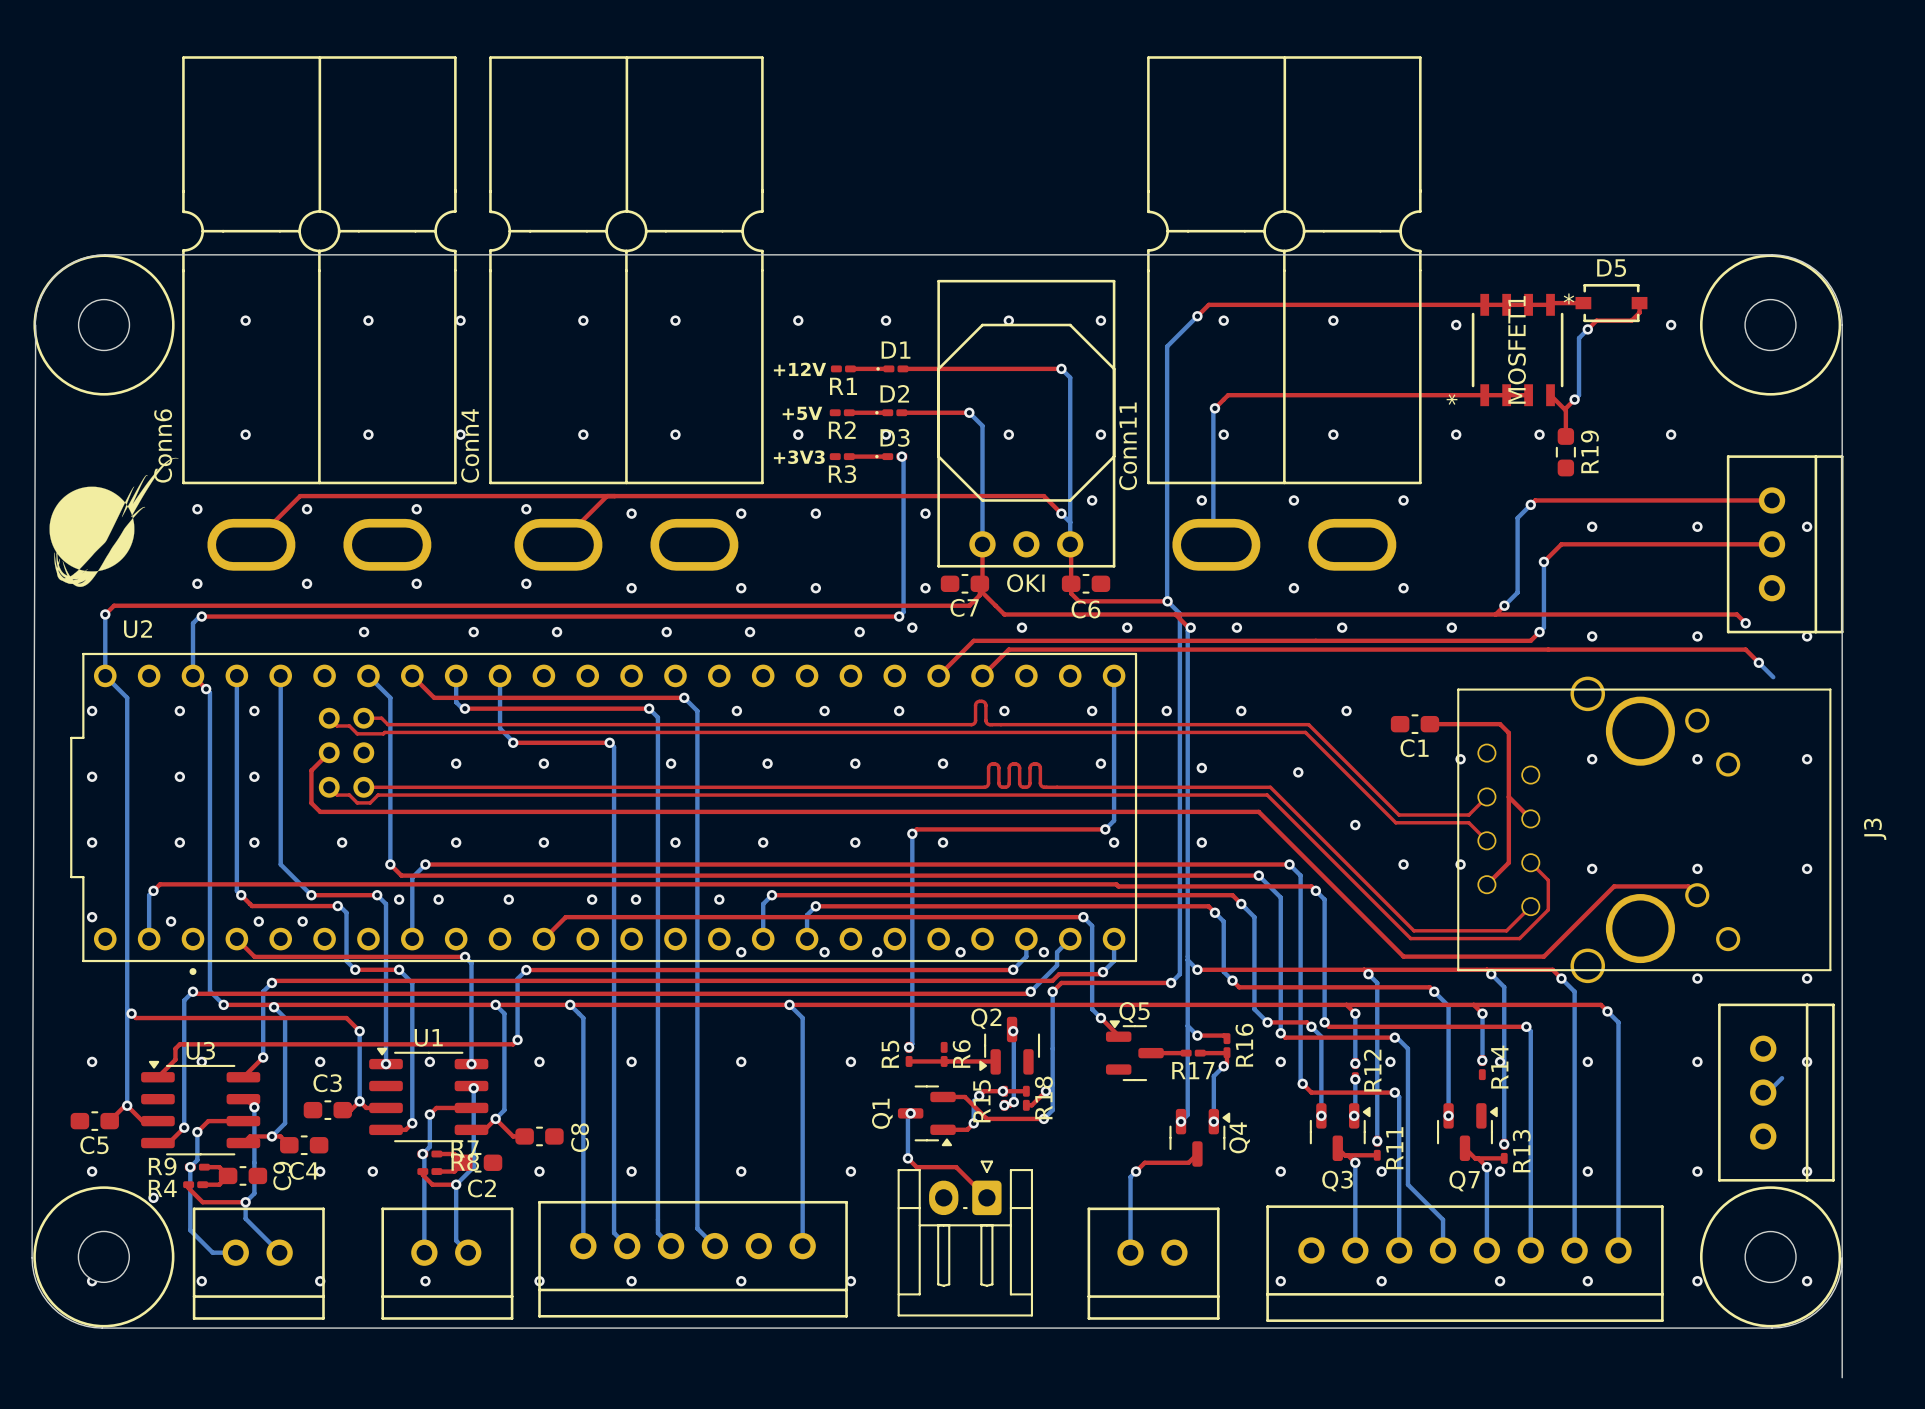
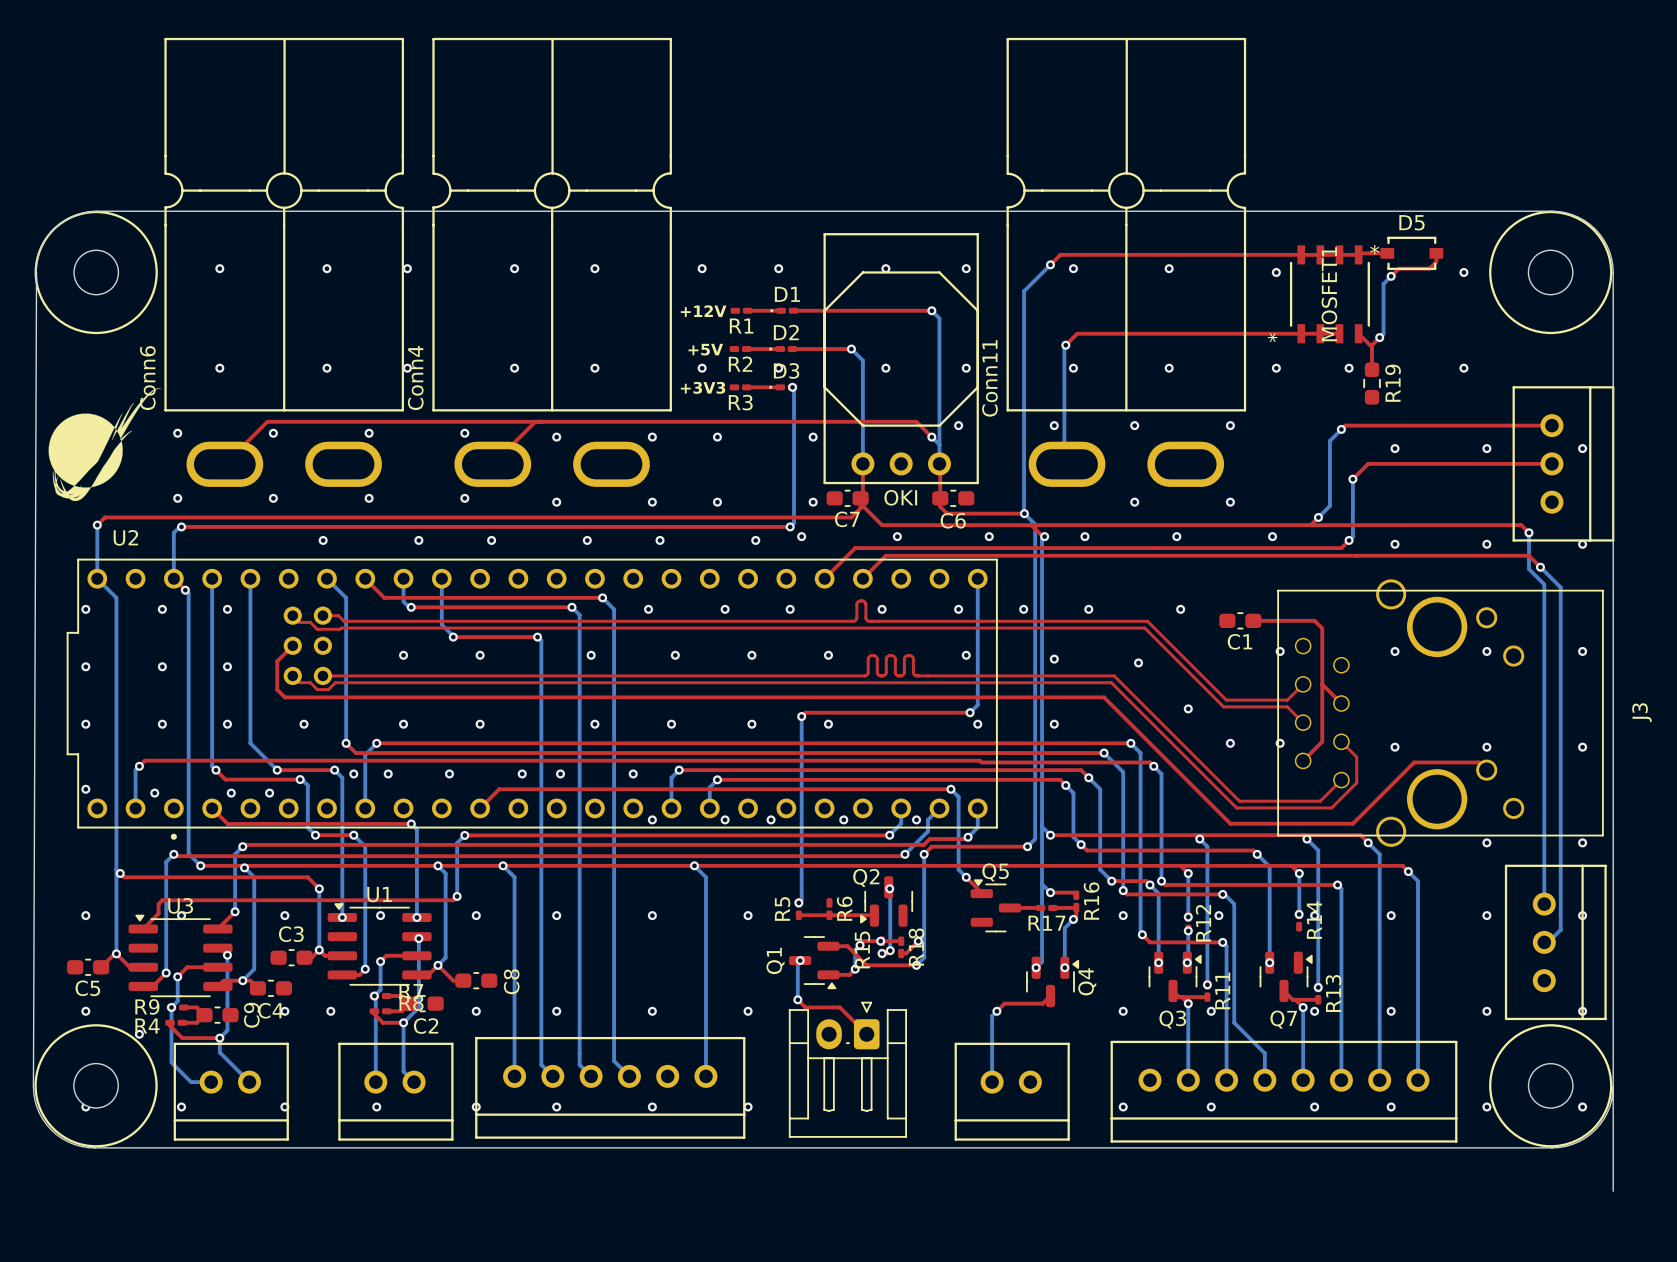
bottom track: none -> (1528, 532) (1528, 569) (1544, 584) (1544, 904)
bottom track: none -> (1553, 579) (1560, 587) (1560, 929)

